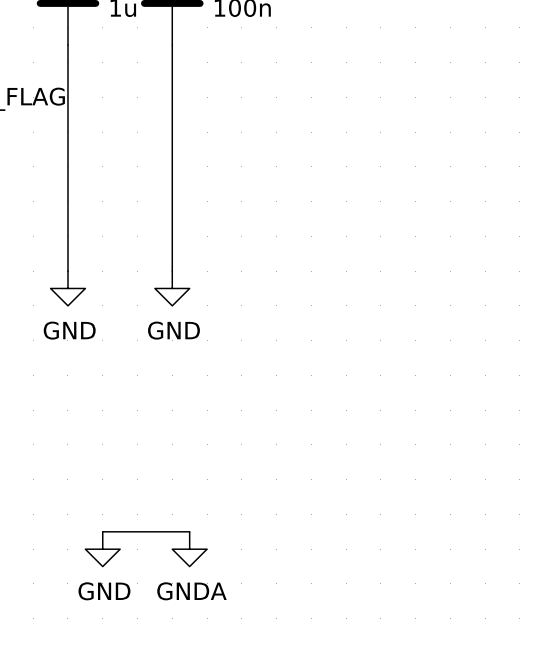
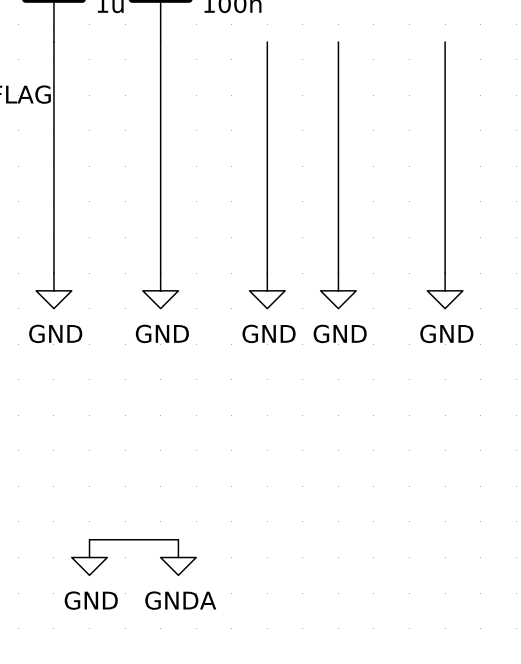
wire: none -> (267, 41) (267, 273)
wire: none -> (338, 41) (338, 273)
wire: none -> (445, 41) (445, 273)
power symbol: none -> GND (267, 290)
power symbol: none -> GND (338, 290)
power symbol: none -> GND (445, 290)

